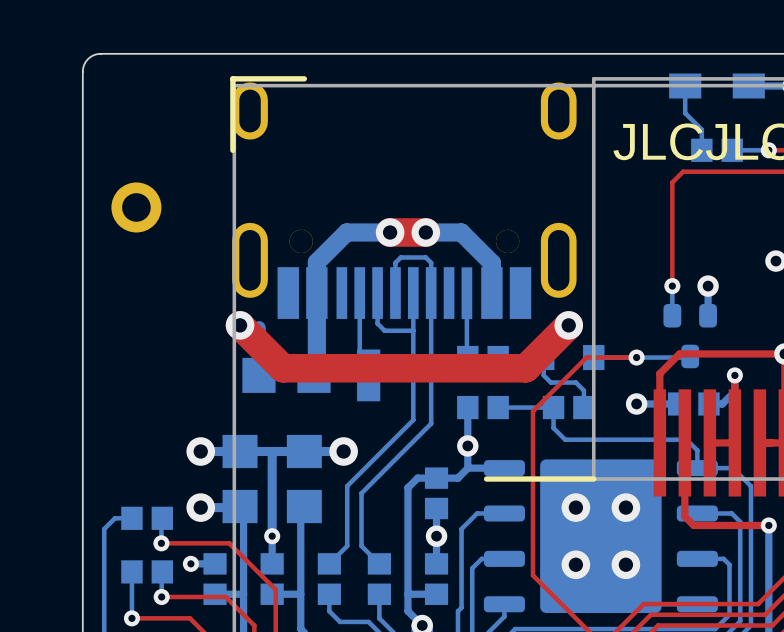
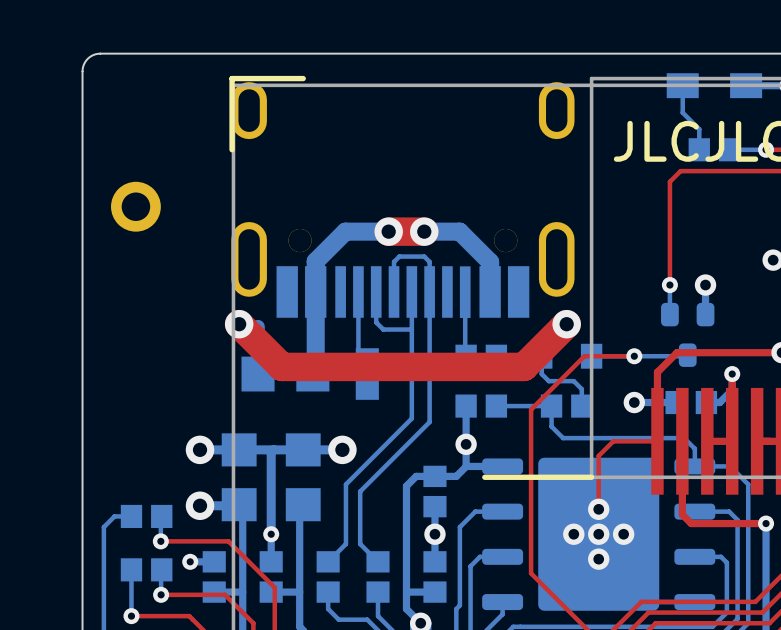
top track: none -> (657, 441) (613, 441) (598, 455) (598, 509)
via: (575, 507) -> none
via: (625, 507) -> none
via: none -> (598, 509)
via: none -> (573, 534)
via: none -> (598, 534)
via: none -> (623, 534)
via: none -> (598, 559)
via: (575, 564) -> none
via: (625, 564) -> none

